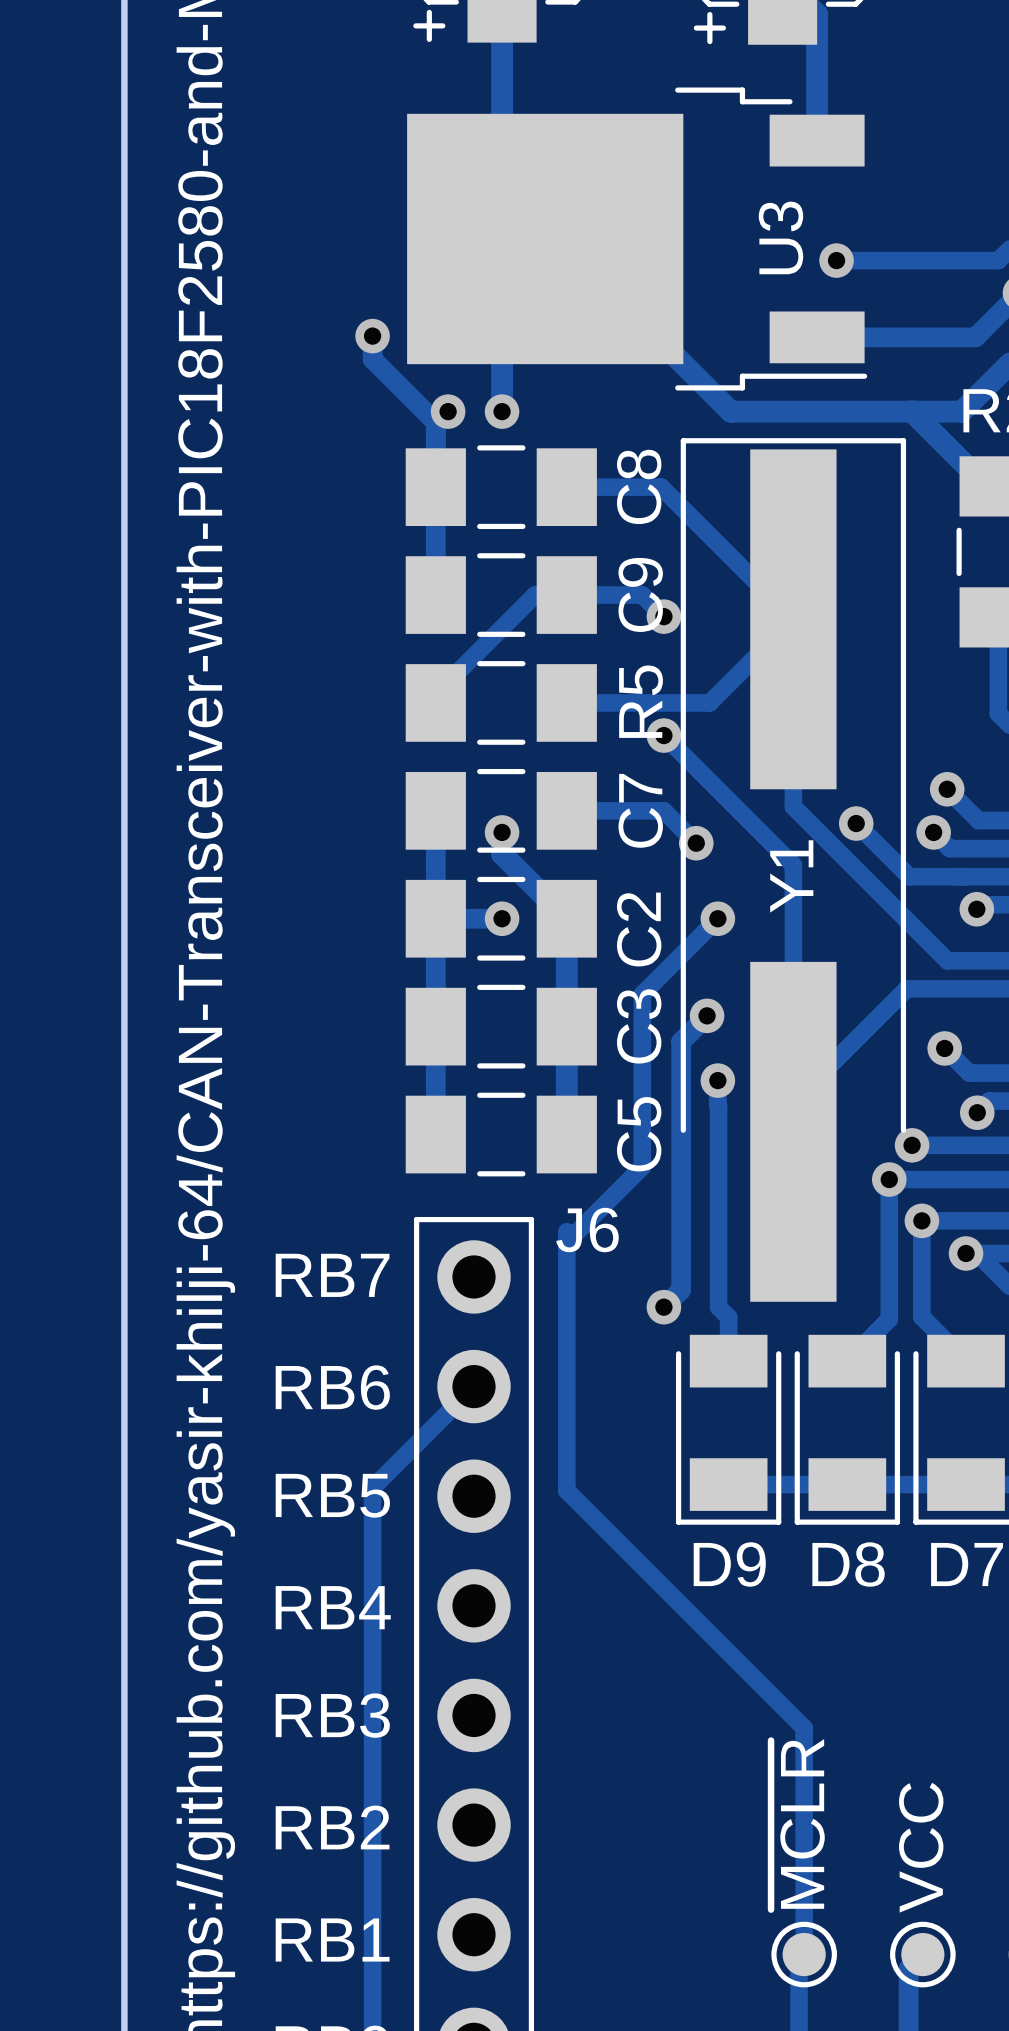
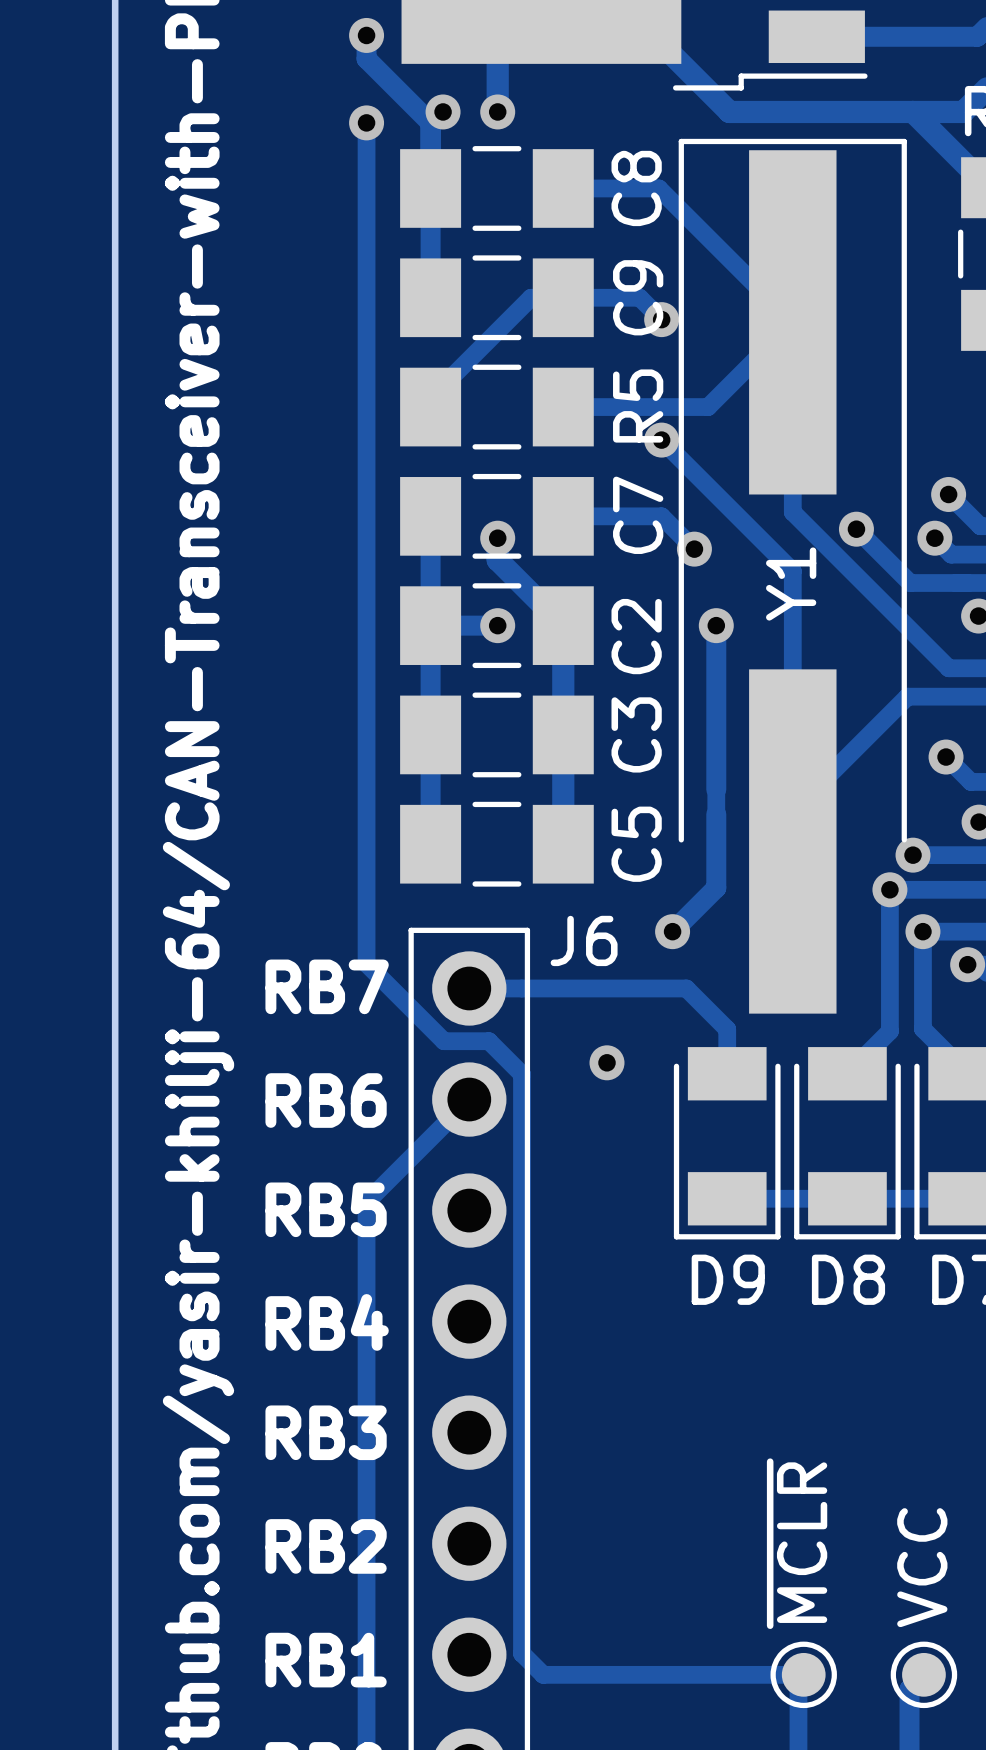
via: none -> (366, 122)
track: (717, 918) (642, 994) (642, 1166) (566, 1242) -> (716, 625) (716, 789)
track: (707, 1015) (681, 1041) (681, 1289) (663, 1307) -> none
via: (707, 1015) -> none
via: (717, 1080) -> none
track: (717, 1105) (718, 1307) -> (716, 814) (716, 887) (672, 931)
via: none -> (672, 931)
track: (566, 1231) (566, 1490) (804, 1727) (804, 1954) -> (366, 122) (366, 963) (443, 1041) (488, 1041) (522, 1074) (522, 1653) (543, 1674) (803, 1674)
track: none -> (469, 988) (686, 988) (717, 1019)
via: (663, 1307) -> none
via: none -> (607, 1062)

